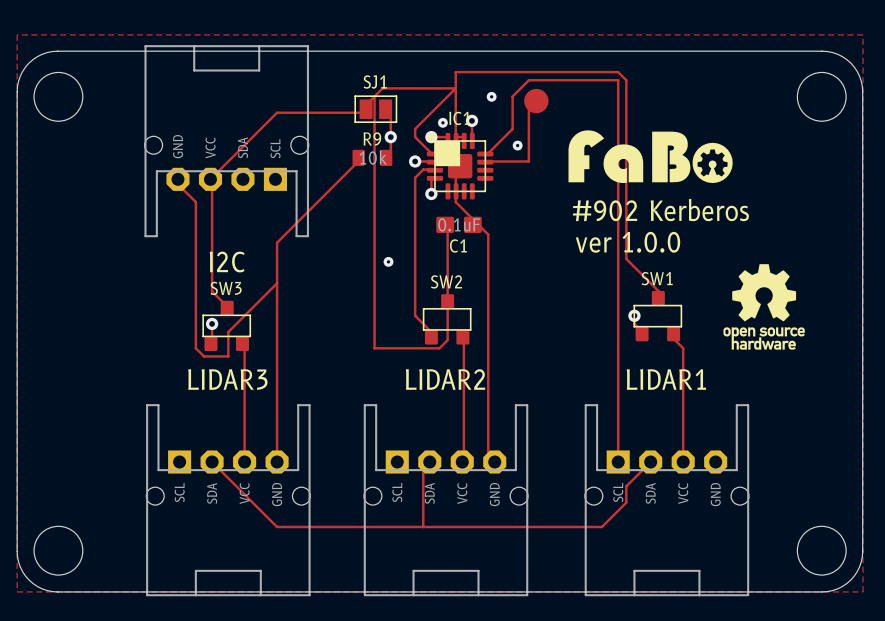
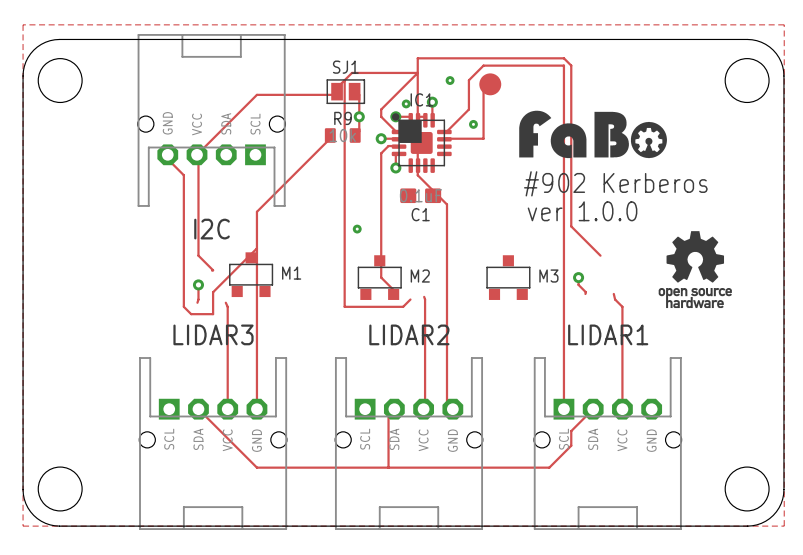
track: (447, 226) (447, 340) -> none
M1: none -> (251, 274)
M2: none -> (379, 277)
M3: none -> (508, 277)
SW1: (657, 316) -> none
SW2: (447, 319) -> none
SW3: (226, 325) -> none

